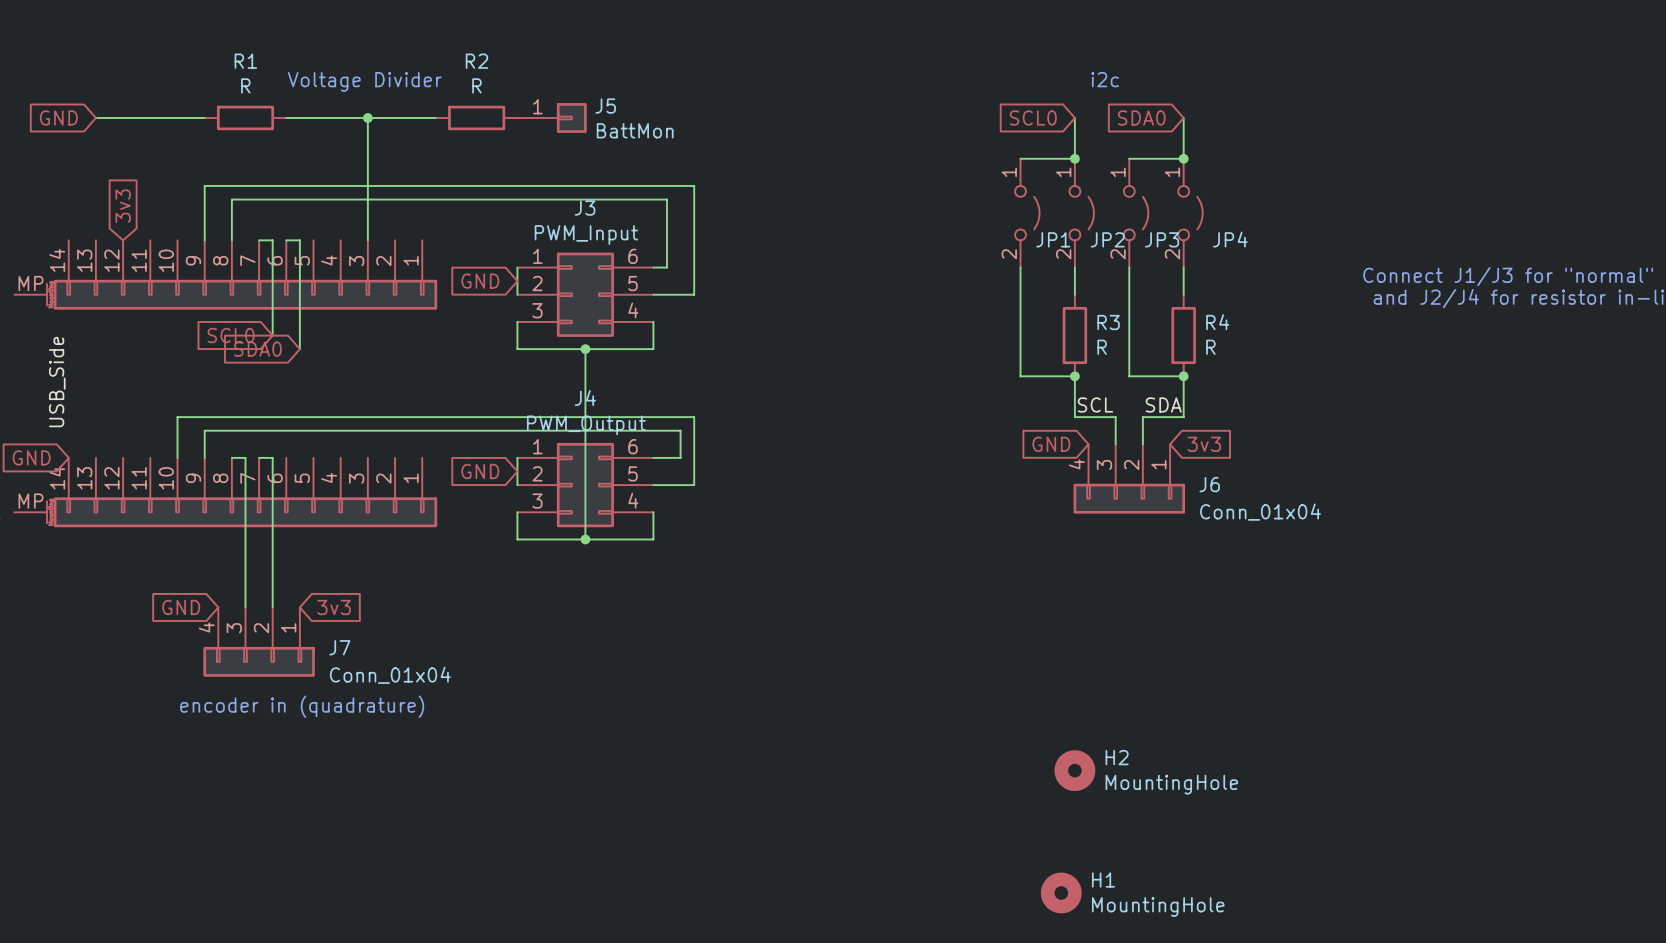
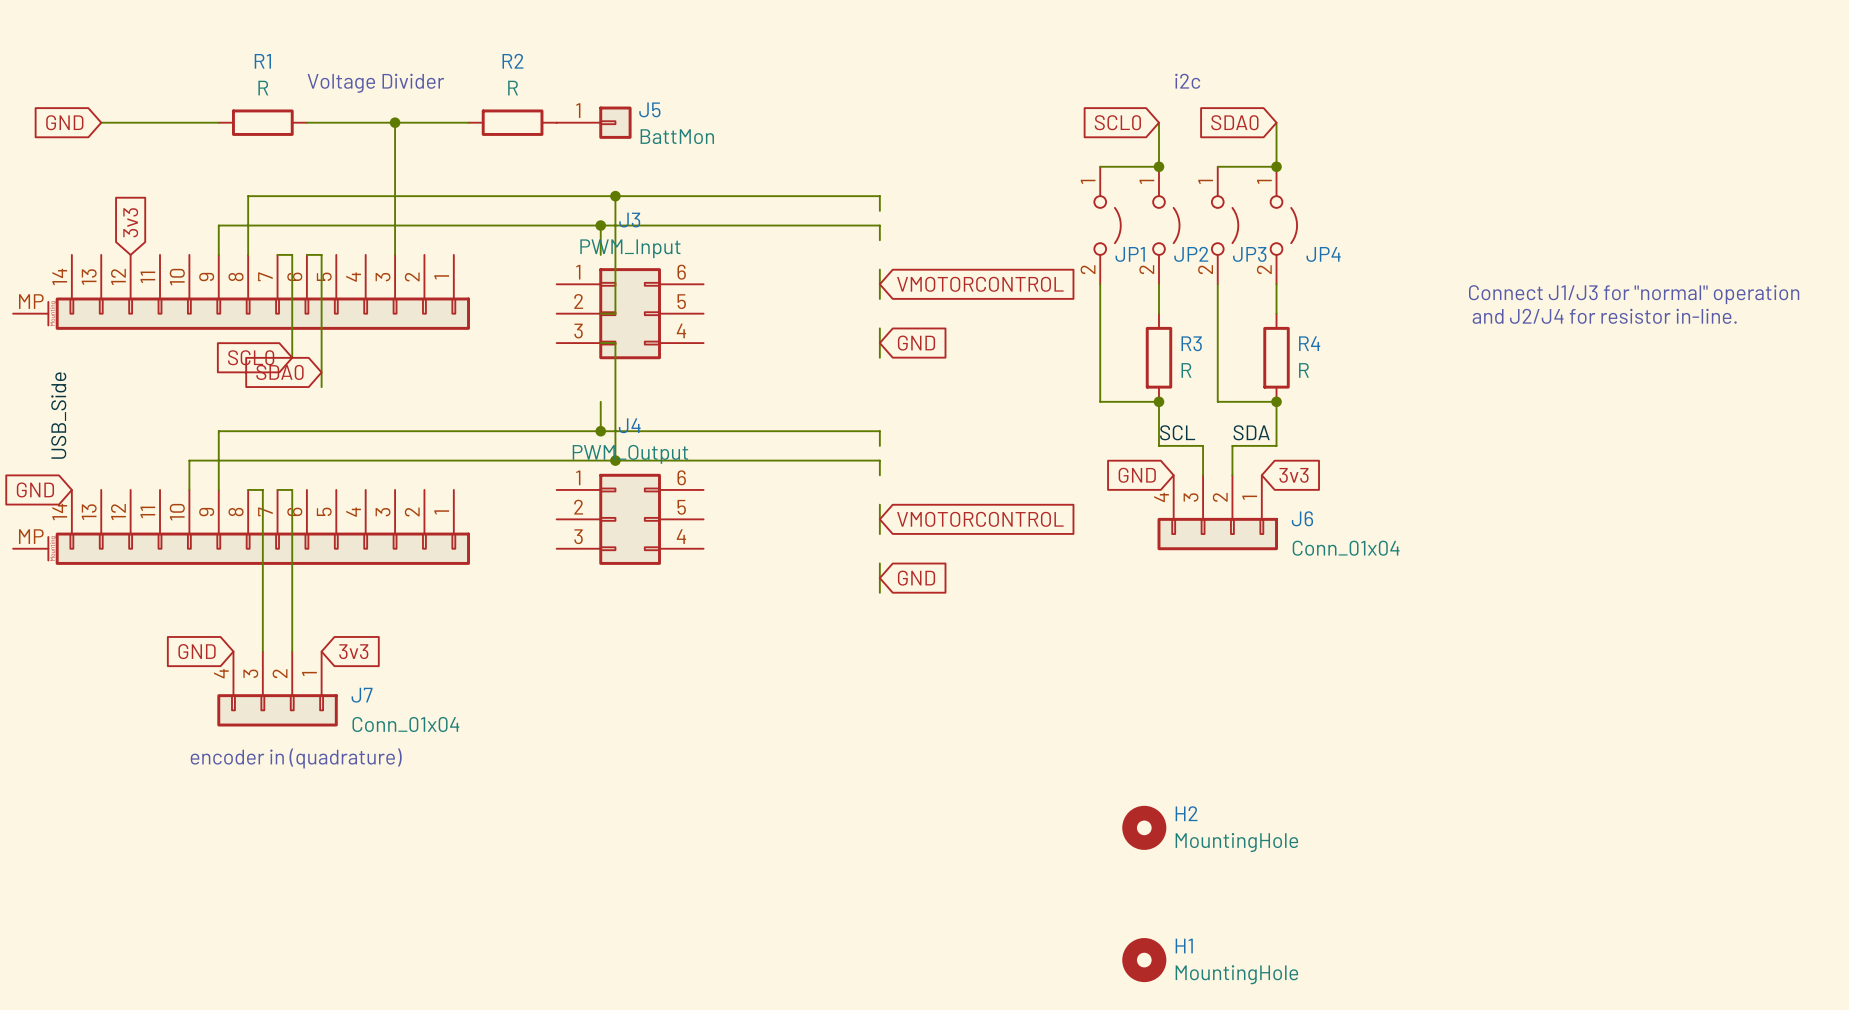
wire: (231, 185) (204, 185) (204, 213) -> (248, 196) (248, 210)
wire: none -> (615, 196) (615, 313) (600, 313)
junction: none -> (615, 196)
wire: (694, 185) (694, 294) (653, 294) -> (747, 196) (879, 196) (879, 210)
wire: (231, 199) (667, 199) (667, 267) (653, 267) -> none
wire: none -> (218, 225) (879, 225) (879, 240)
junction: none -> (600, 225)
wire: none -> (879, 269) (879, 298)
wire: (517, 267) (517, 294) -> (600, 225) (600, 254)
global label: none -> VMOTORCONTROL (980, 284)
global label: GND (480, 281) -> none
wire: none -> (879, 328) (879, 357)
wire: (517, 321) (517, 349) (653, 349) (653, 321) -> none
wire: none -> (600, 343) (615, 343) (615, 460)
global label: none -> GND (916, 343)
wire: none -> (321, 372) (321, 387)
wire: (585, 349) (585, 539) -> none
junction: (585, 349) -> none
junction: none -> (600, 431)
wire: (177, 430) (177, 417) (694, 417) (694, 485) (653, 485) -> (189, 460) (218, 460) (218, 431) (879, 431) (879, 445)
junction: none -> (615, 460)
wire: (680, 430) (680, 457) (653, 457) -> (732, 460) (879, 460) (879, 475)
wire: (517, 457) (517, 485) -> (600, 401) (600, 431)
global label: GND (480, 471) -> none
wire: none -> (879, 504) (879, 534)
global label: none -> VMOTORCONTROL (980, 519)
wire: (517, 512) (517, 539) (653, 539) (653, 512) -> none
wire: none -> (879, 563) (879, 592)
junction: (585, 539) -> none
global label: none -> GND (916, 578)
H2 position: (1074, 770) -> (1144, 827)

